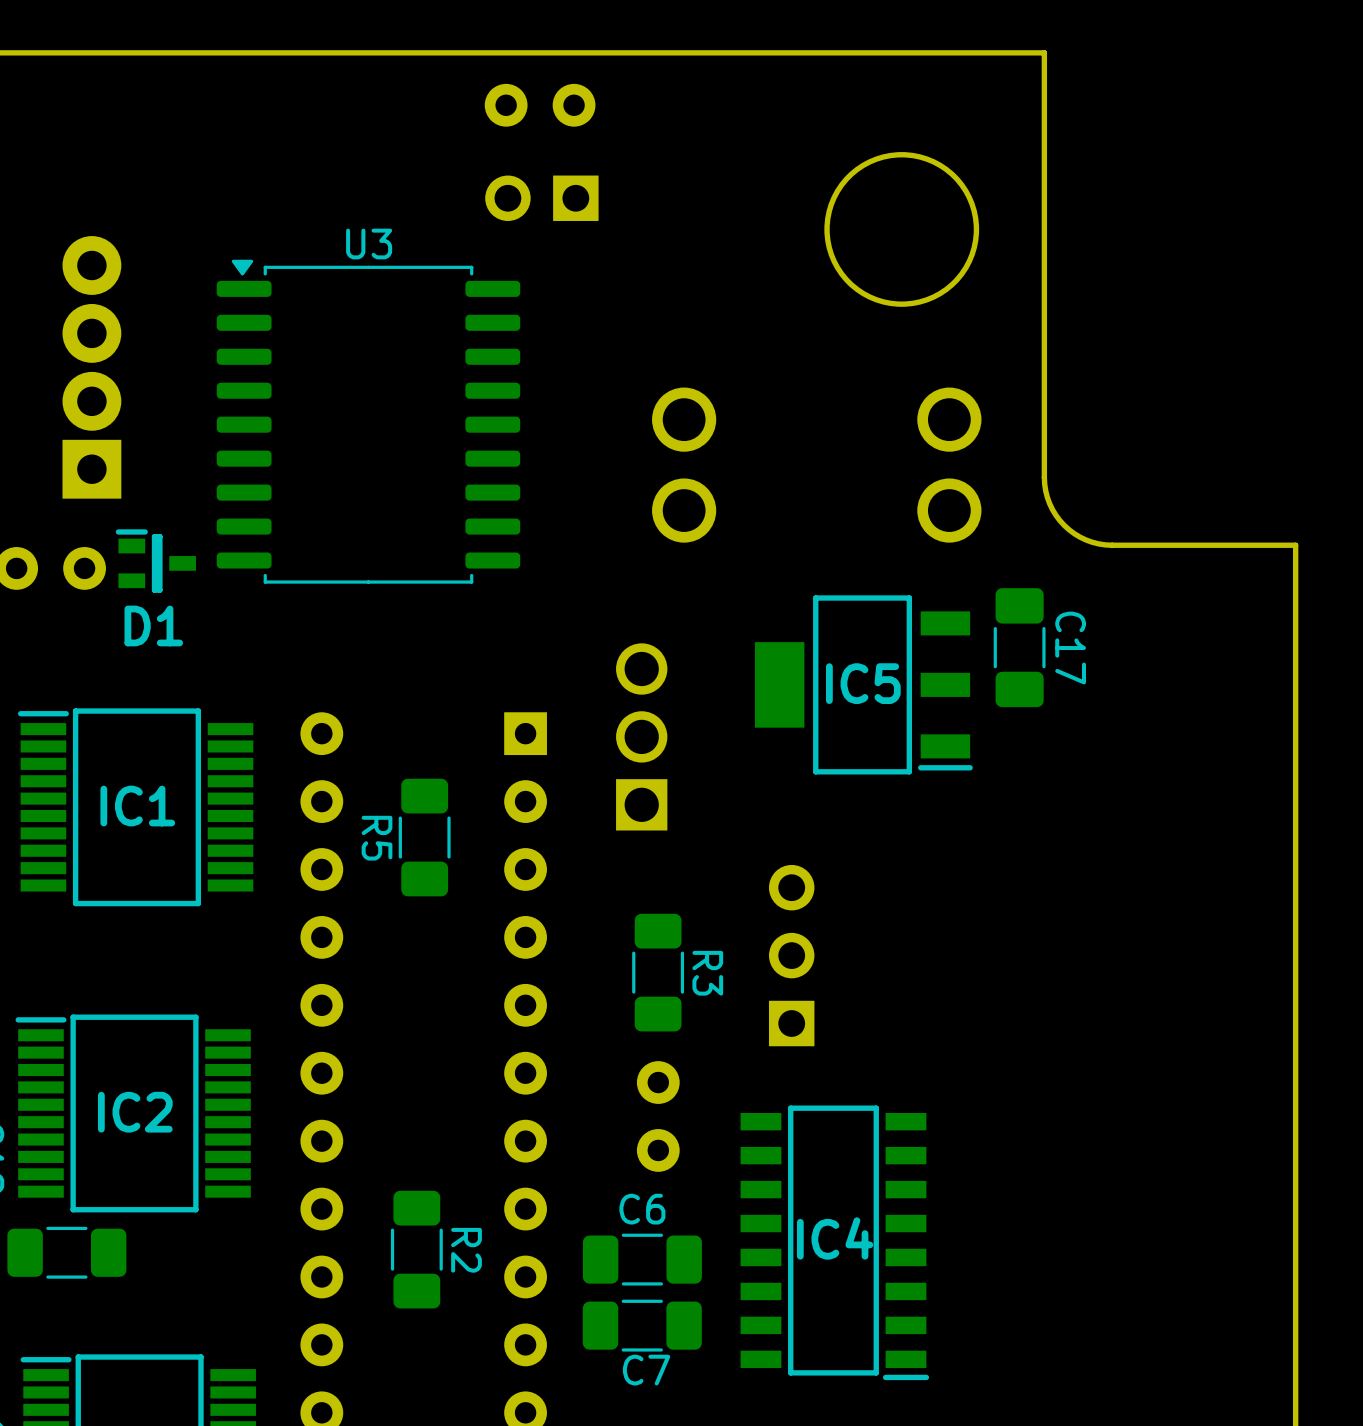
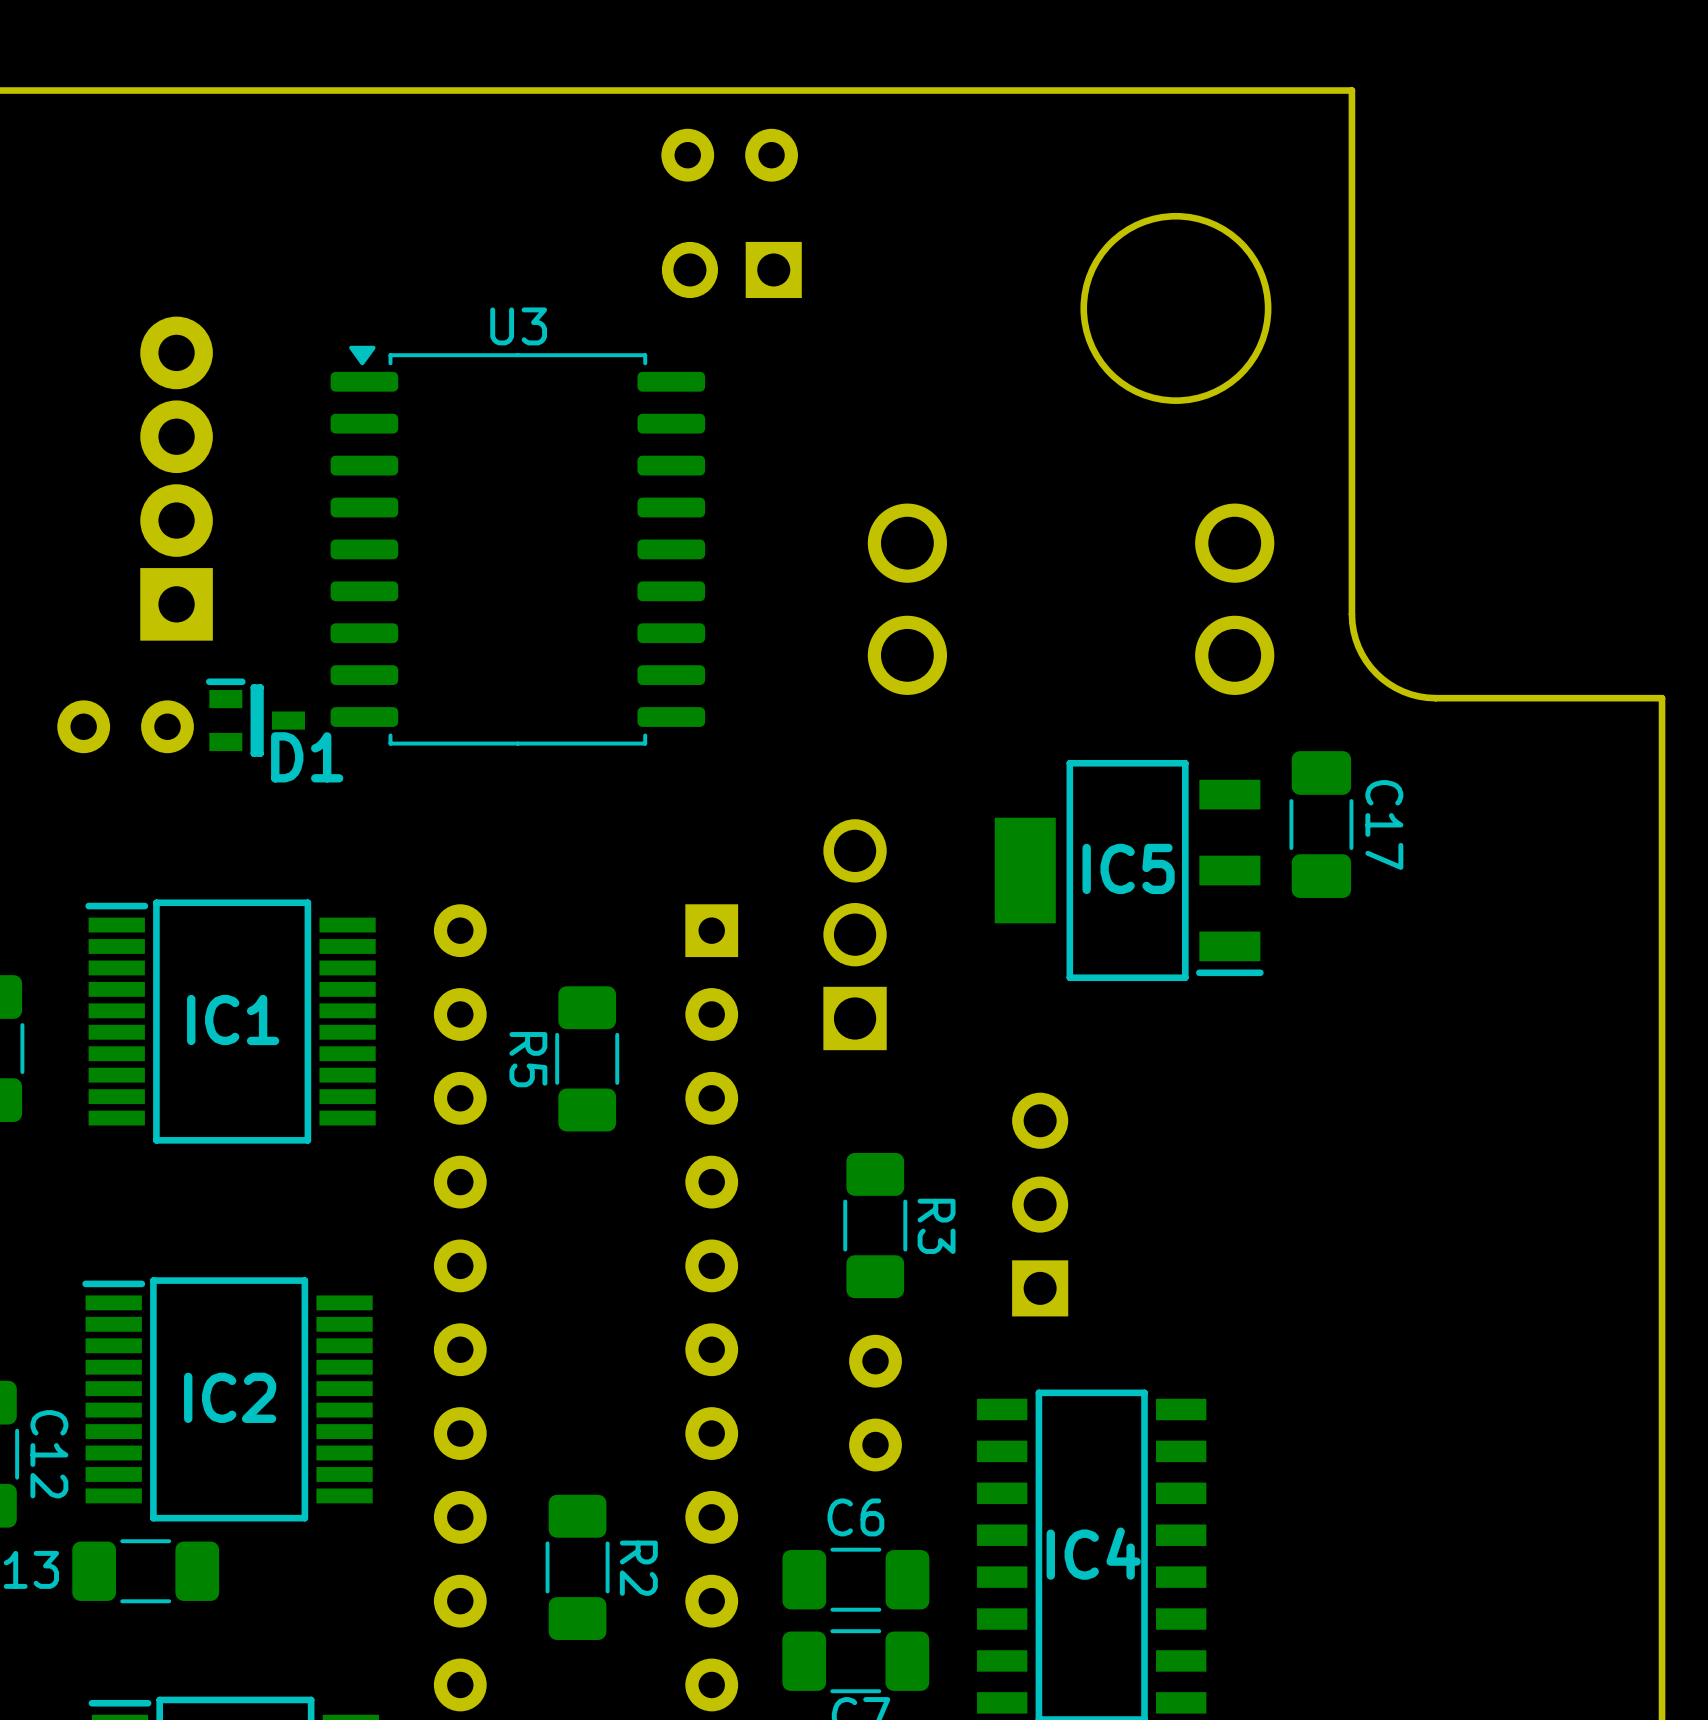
D1 name position: D1 (153, 625) -> D1 (307, 757)

